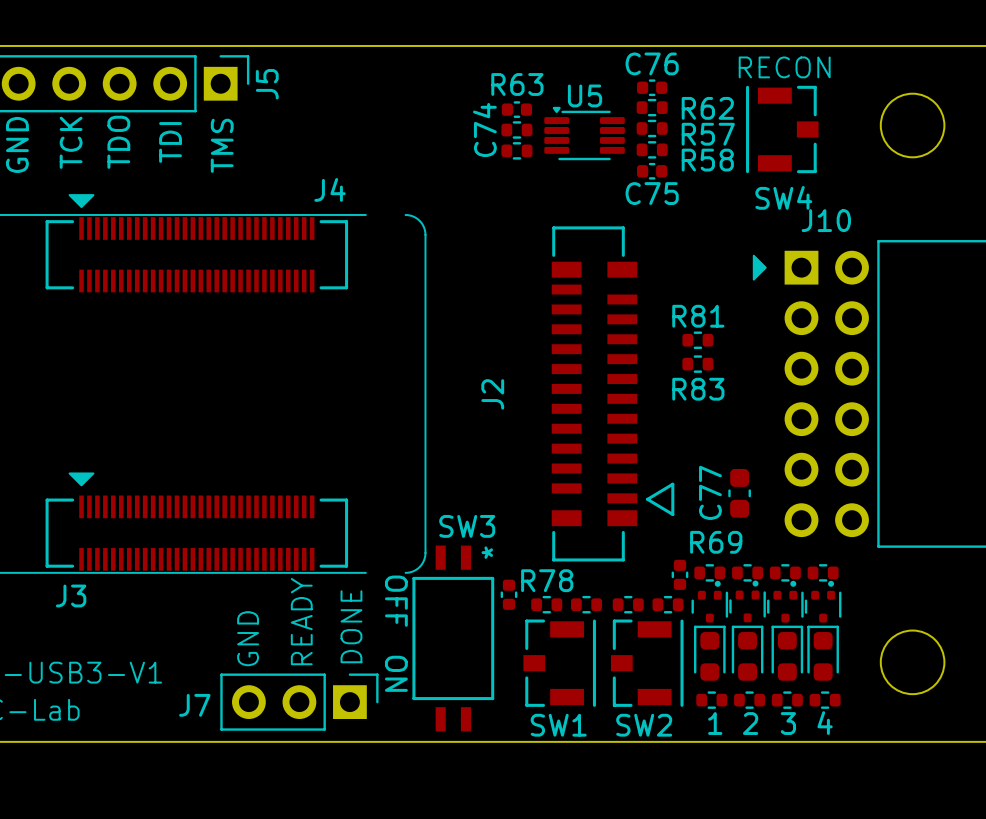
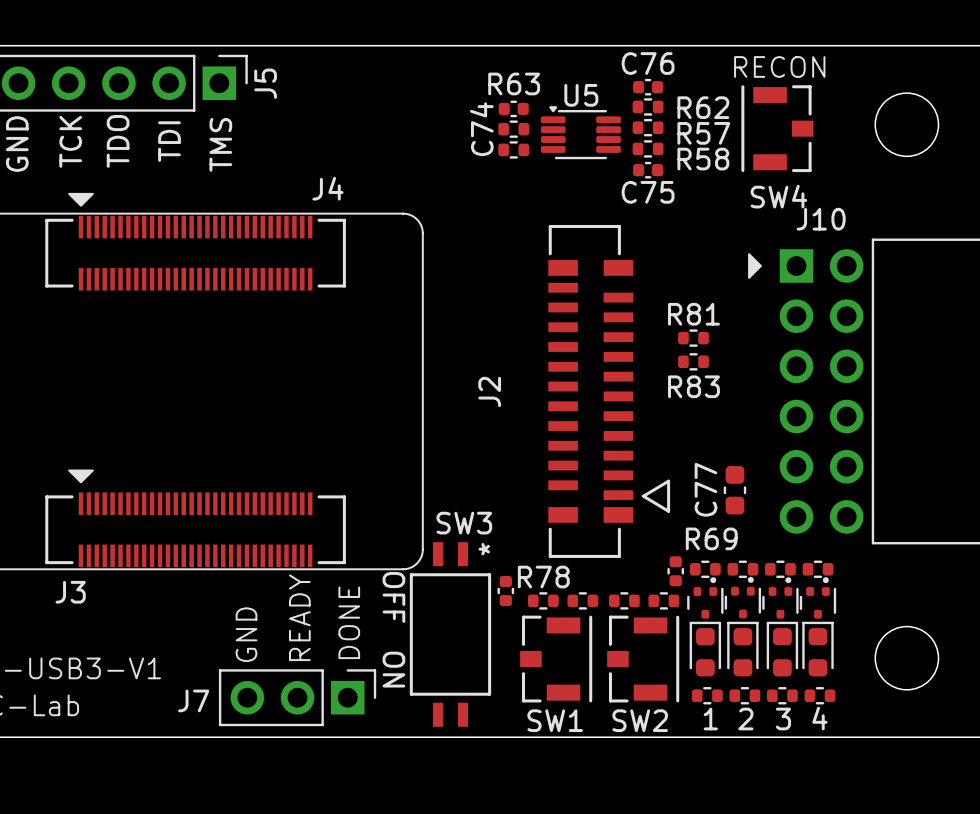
line: none -> (363, 213) (403, 213)
line: none -> (363, 569) (403, 569)

